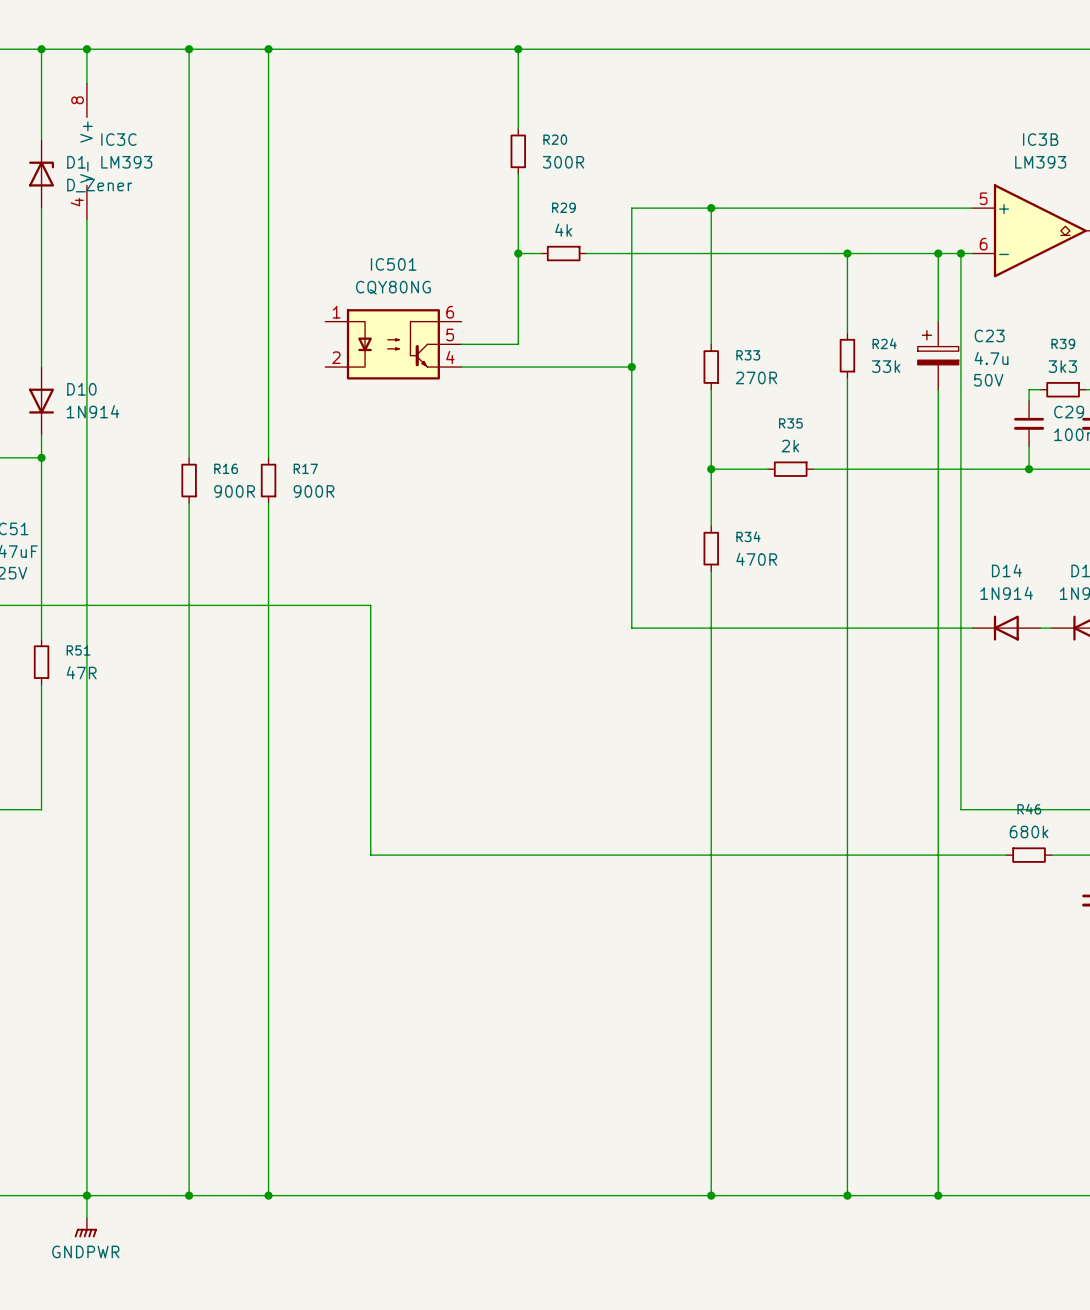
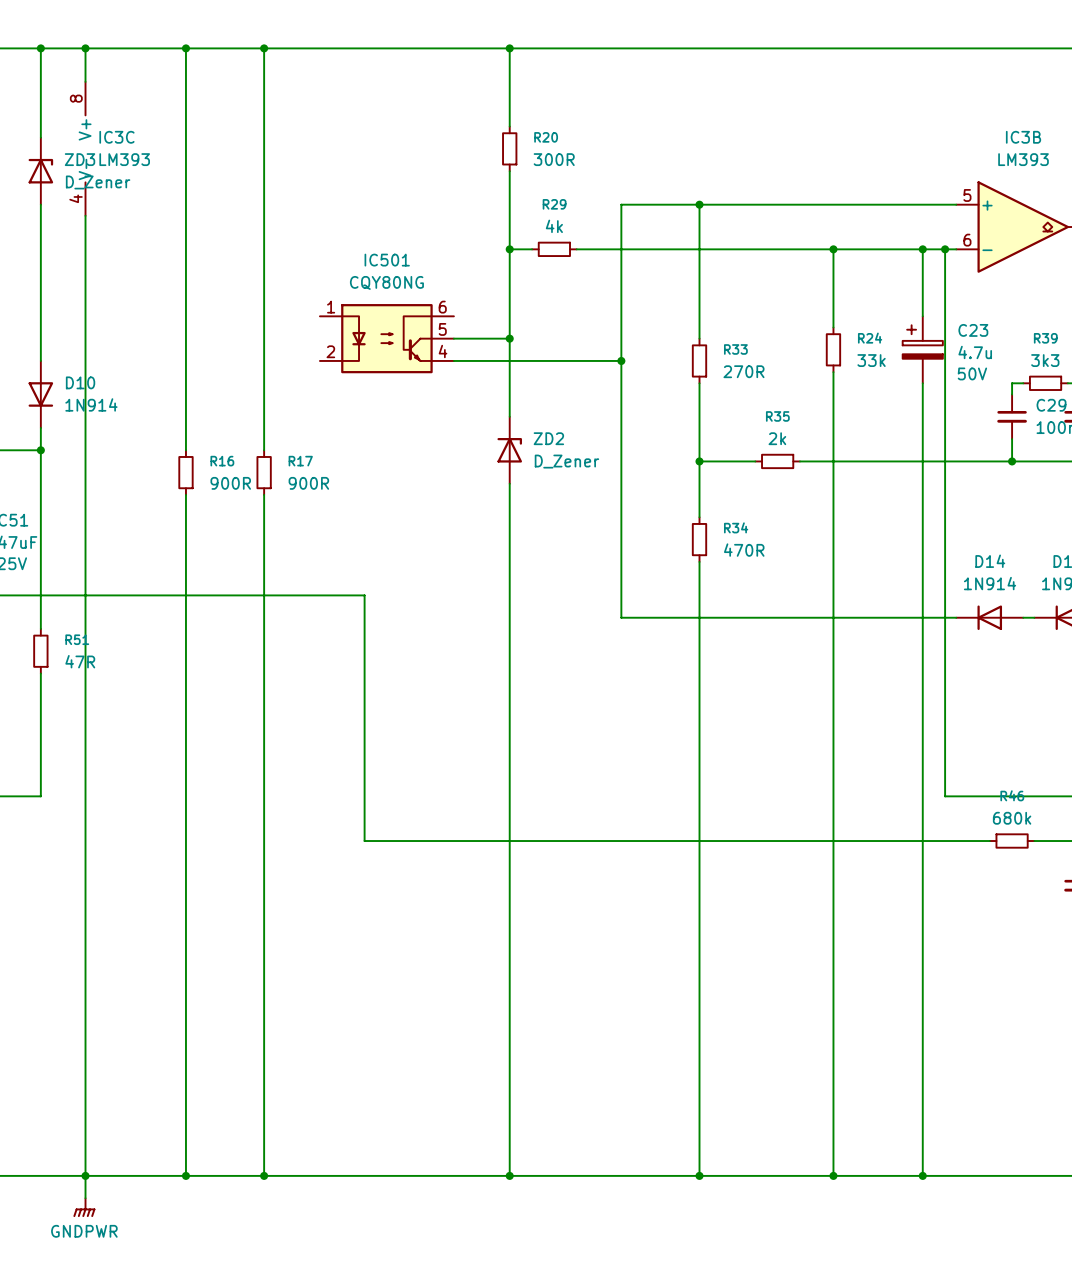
D1 name: D1 (76, 162) -> ZD3 (80, 159)
wire: none -> (509, 338) (509, 416)
junction: none -> (509, 338)
ZD2: none -> D_Zener (509, 450)
wire: none -> (509, 483) (509, 1175)
junction: none -> (509, 1175)

